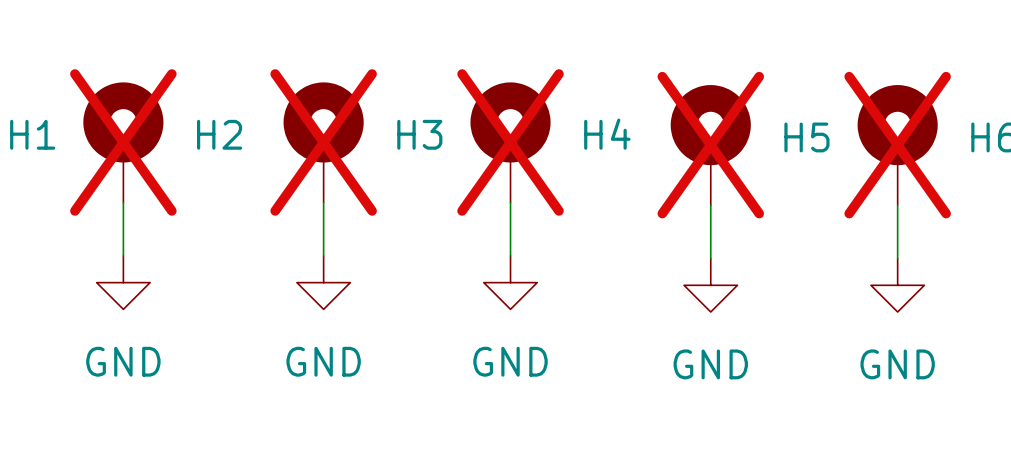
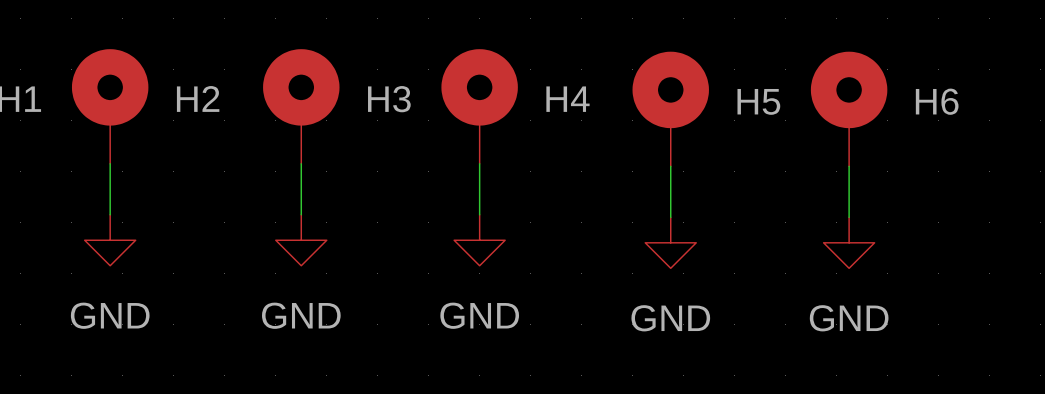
H2 do-not-place cross: (123, 142) -> none
H3 do-not-place cross: (323, 142) -> none
H4 do-not-place cross: (510, 142) -> none
H5 do-not-place cross: (710, 145) -> none
H6 do-not-place cross: (897, 145) -> none

